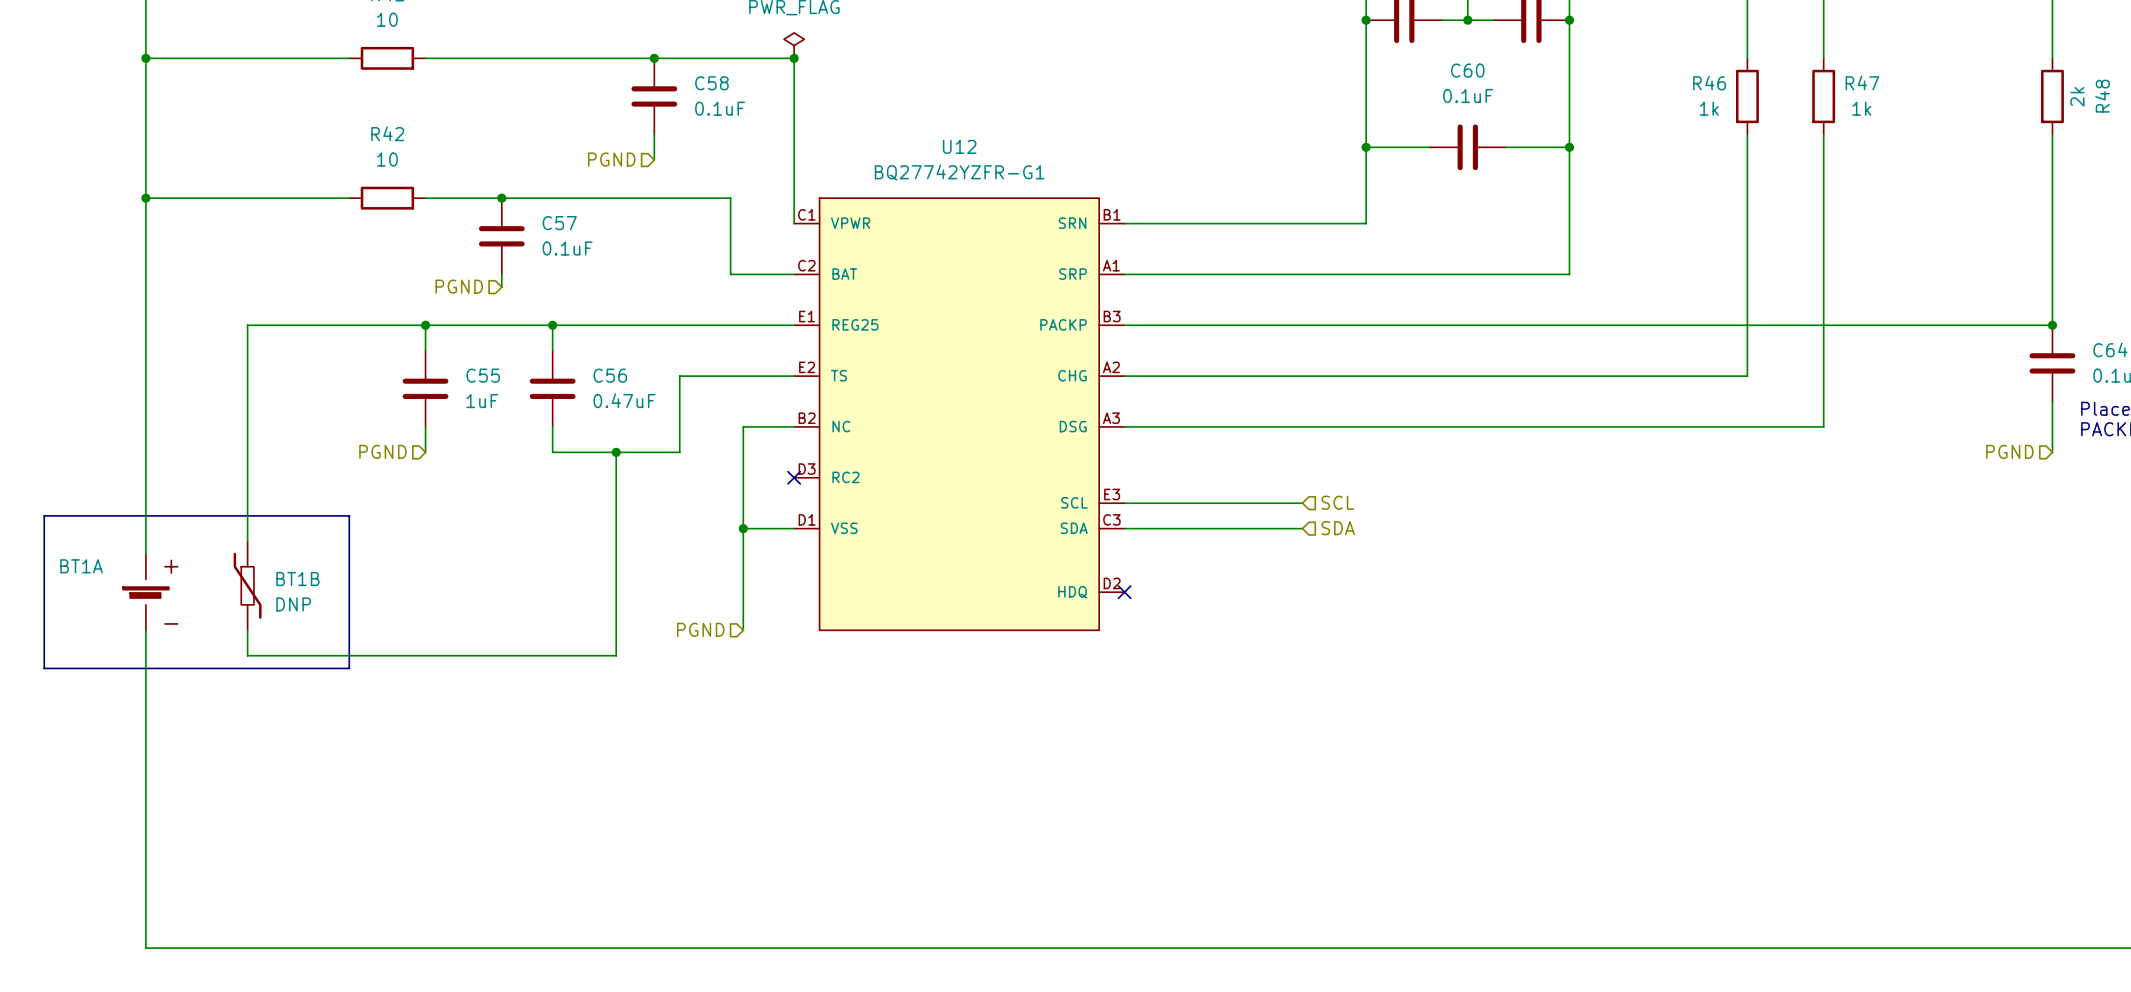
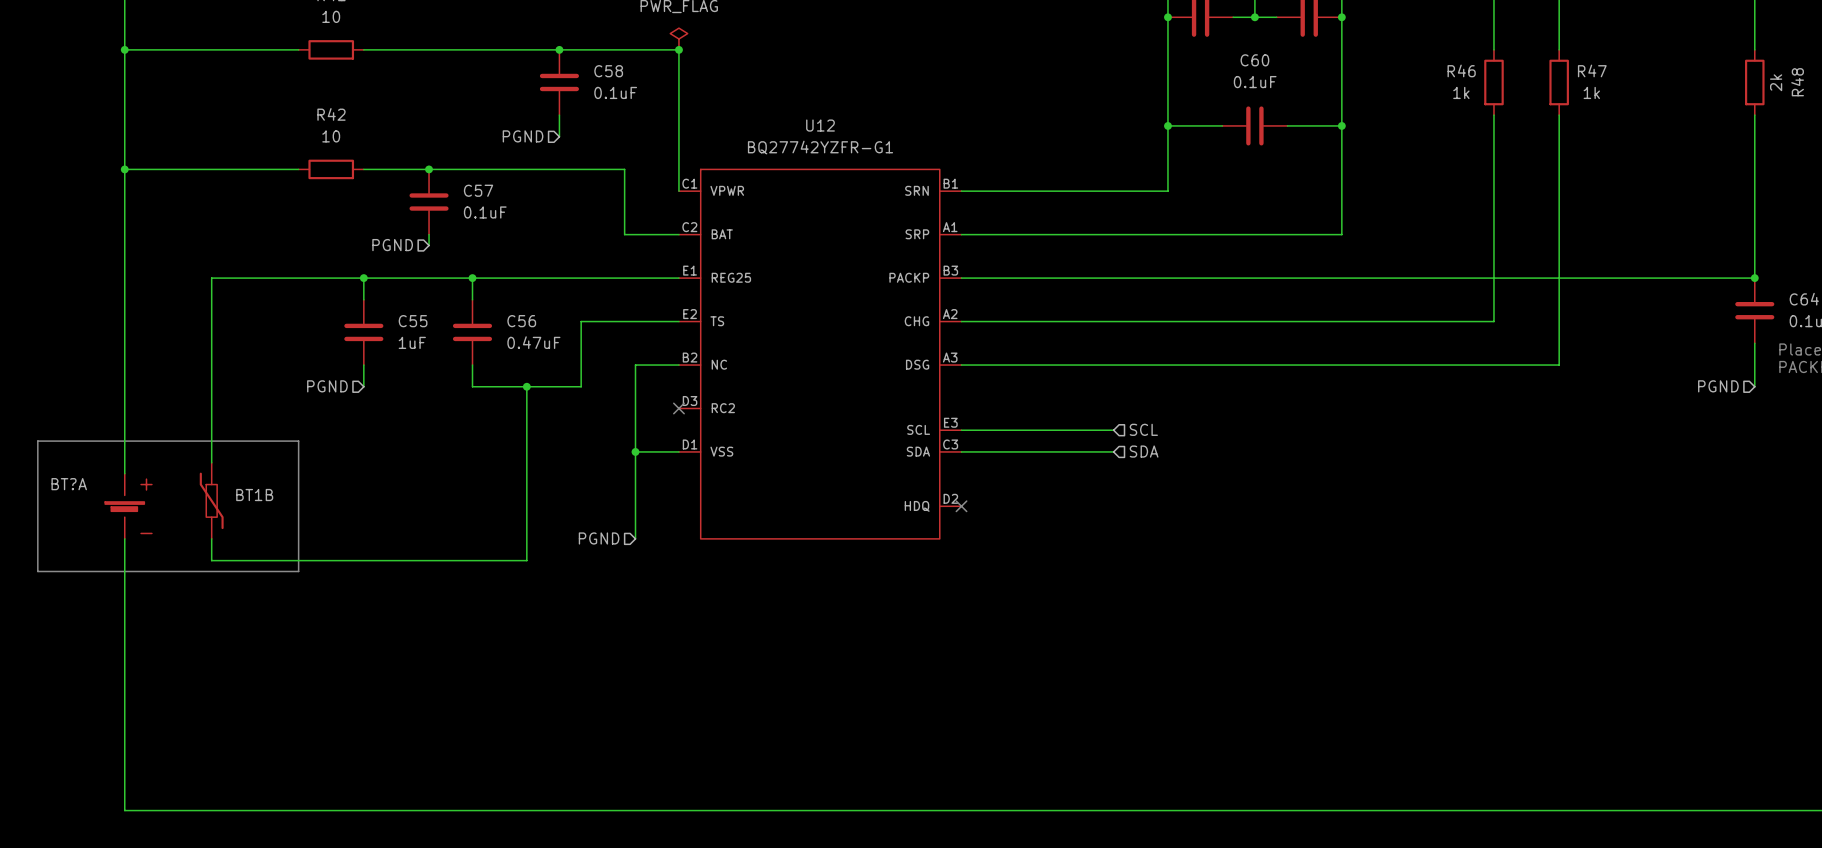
BT1A name: BT1A (81, 566) -> BT?A (69, 484)
BT1B value: DNP (293, 604) -> none

